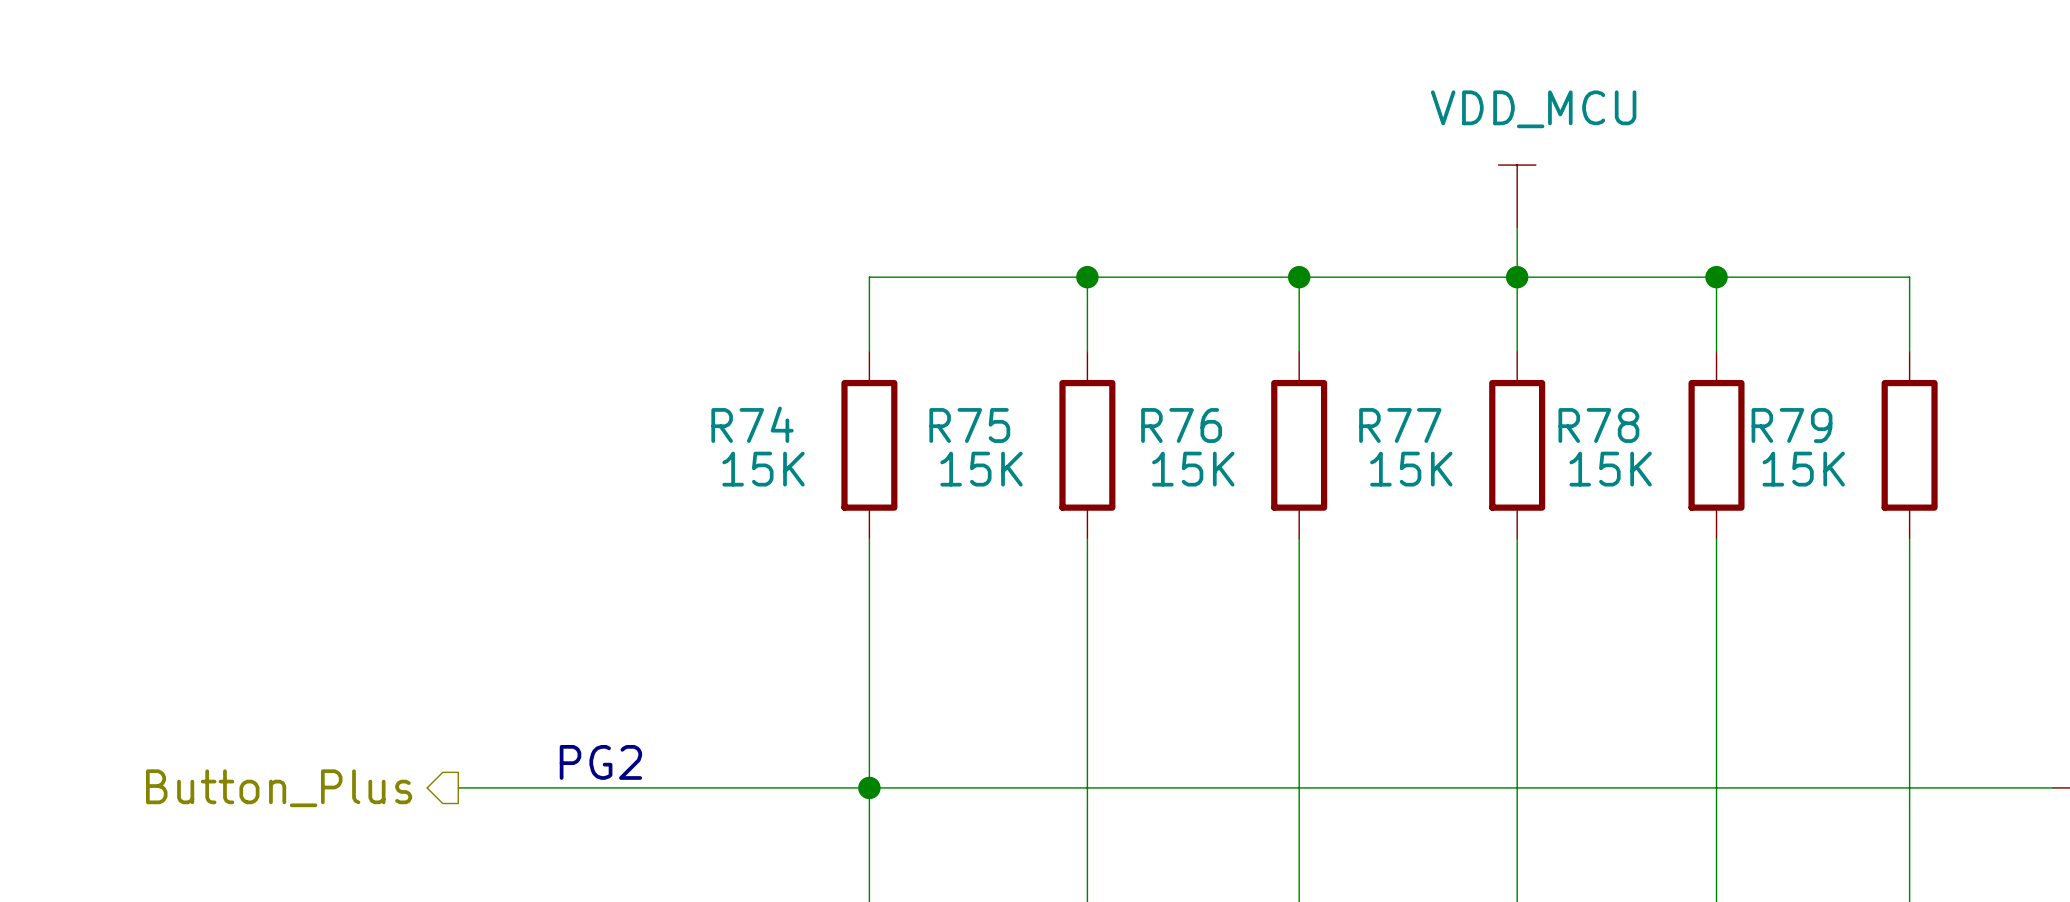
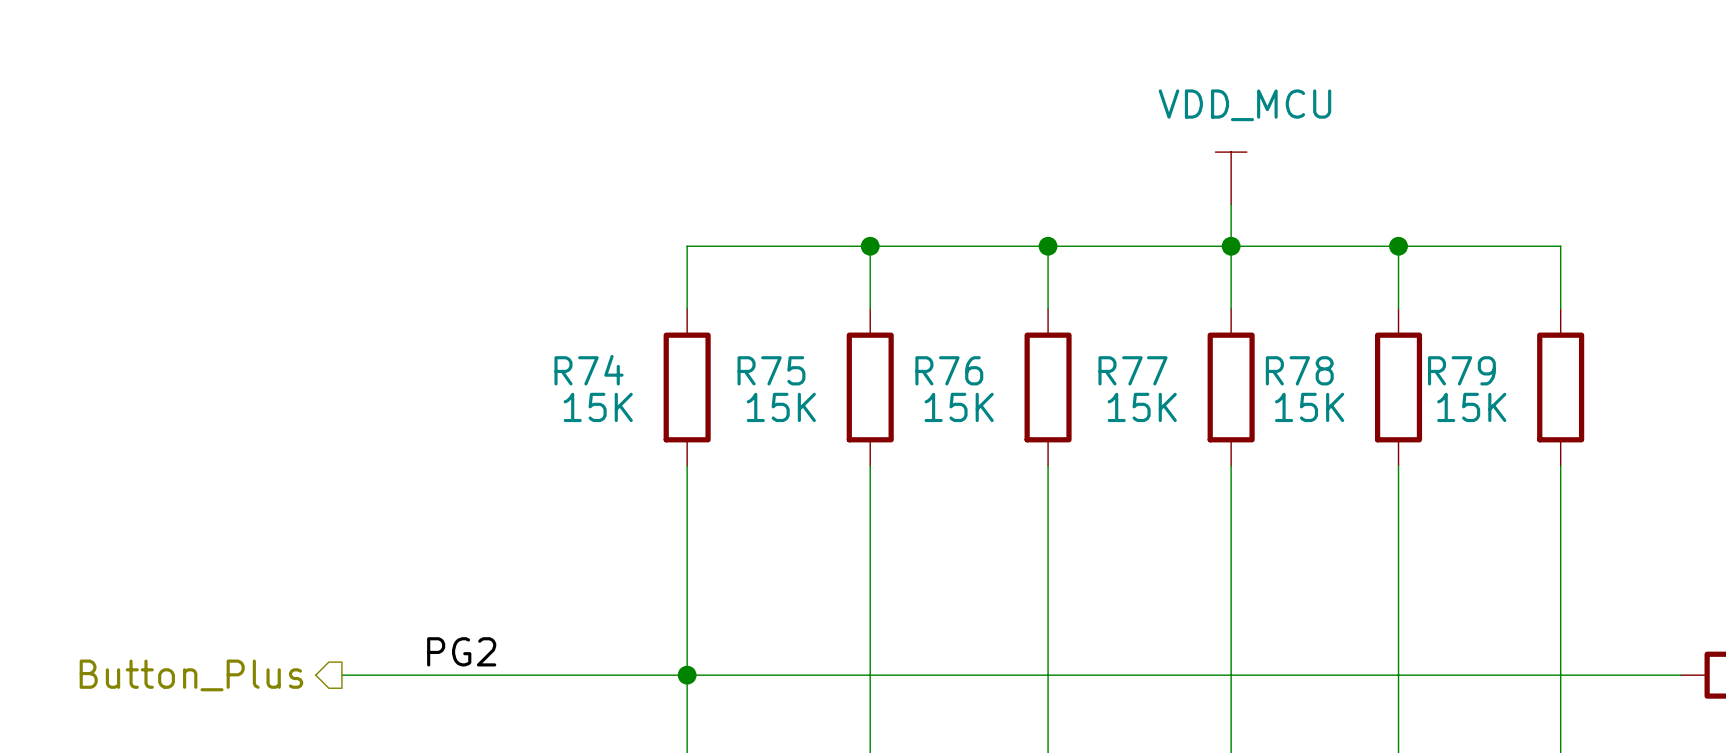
label: none -> PG2 (461, 651)
text: PG2 (600, 762) -> none

